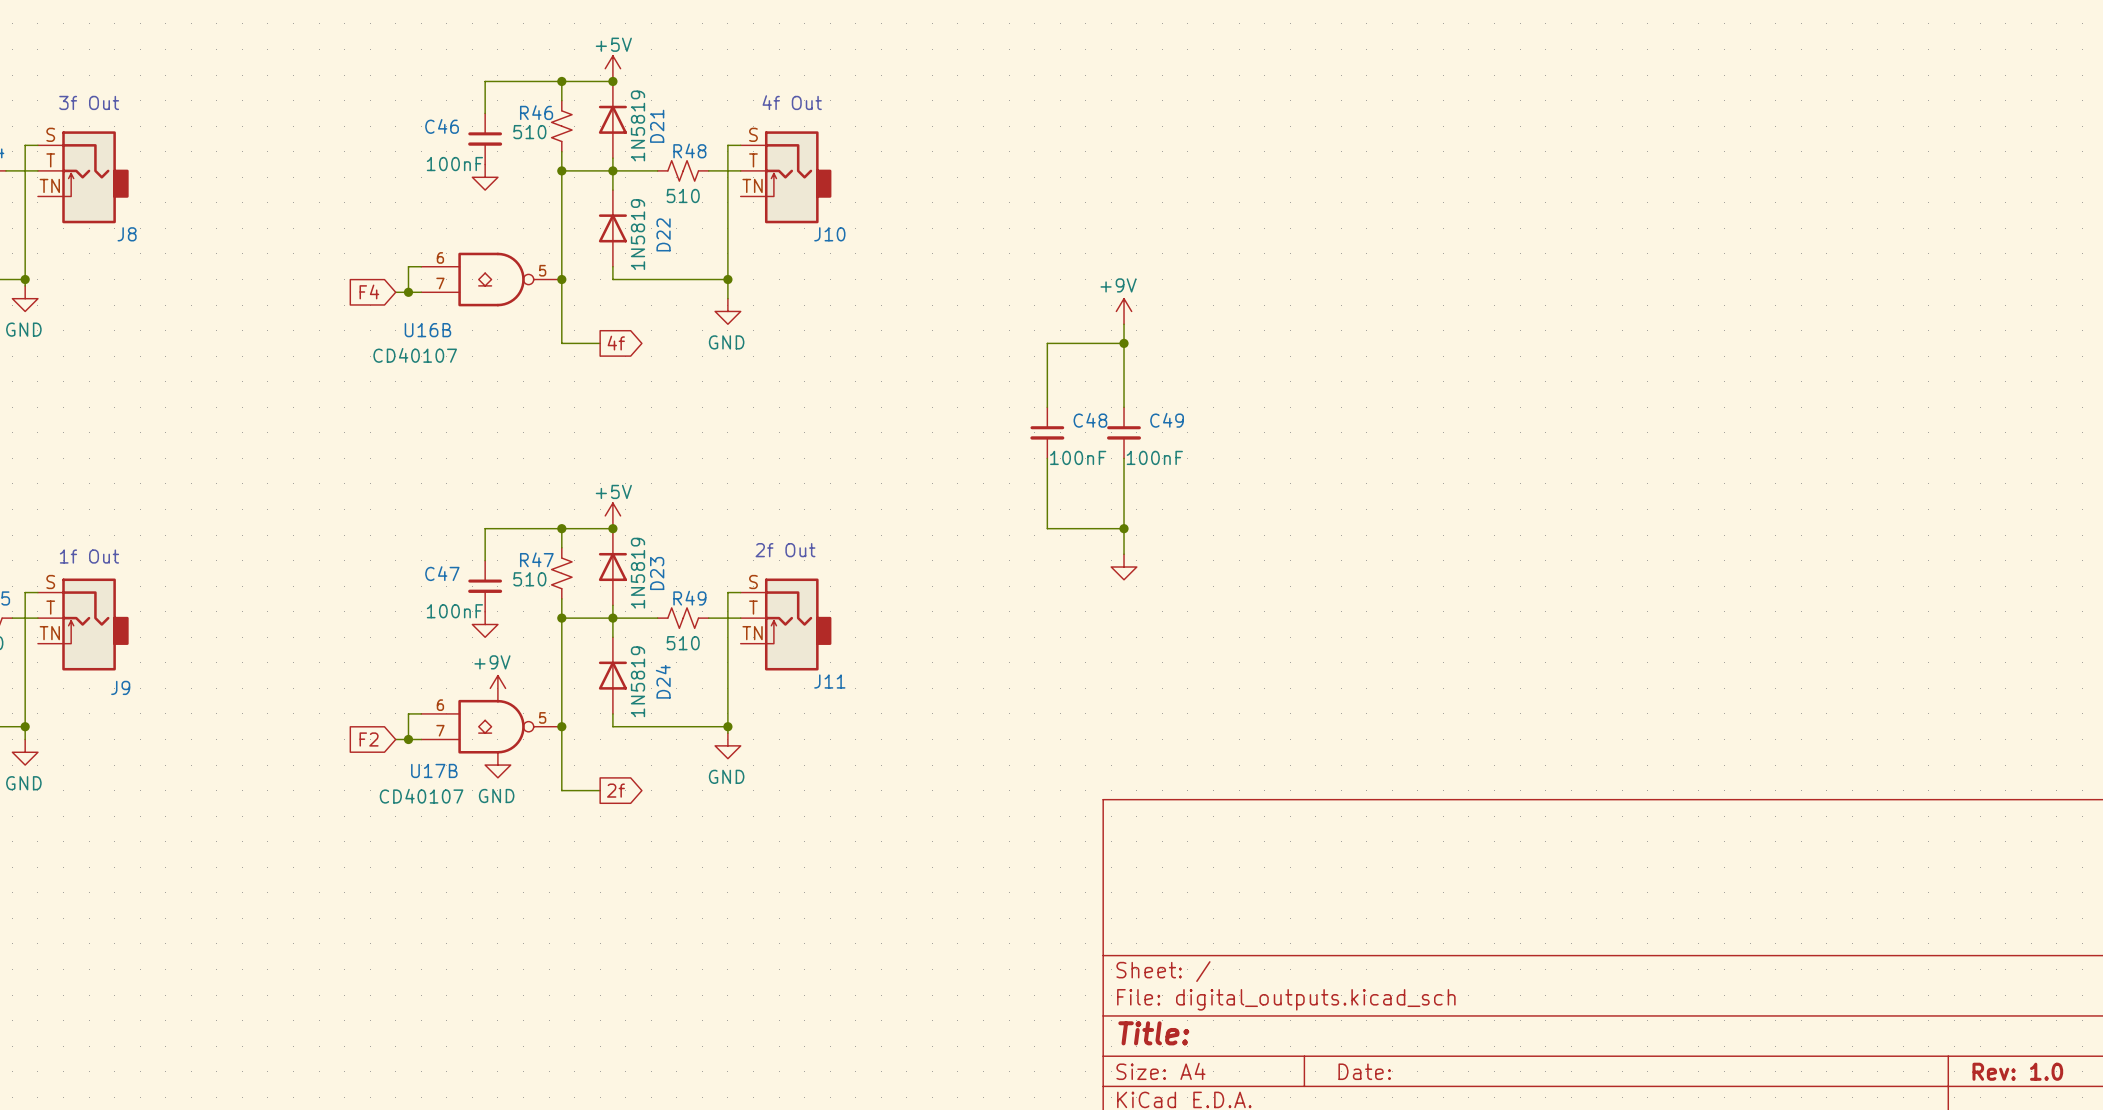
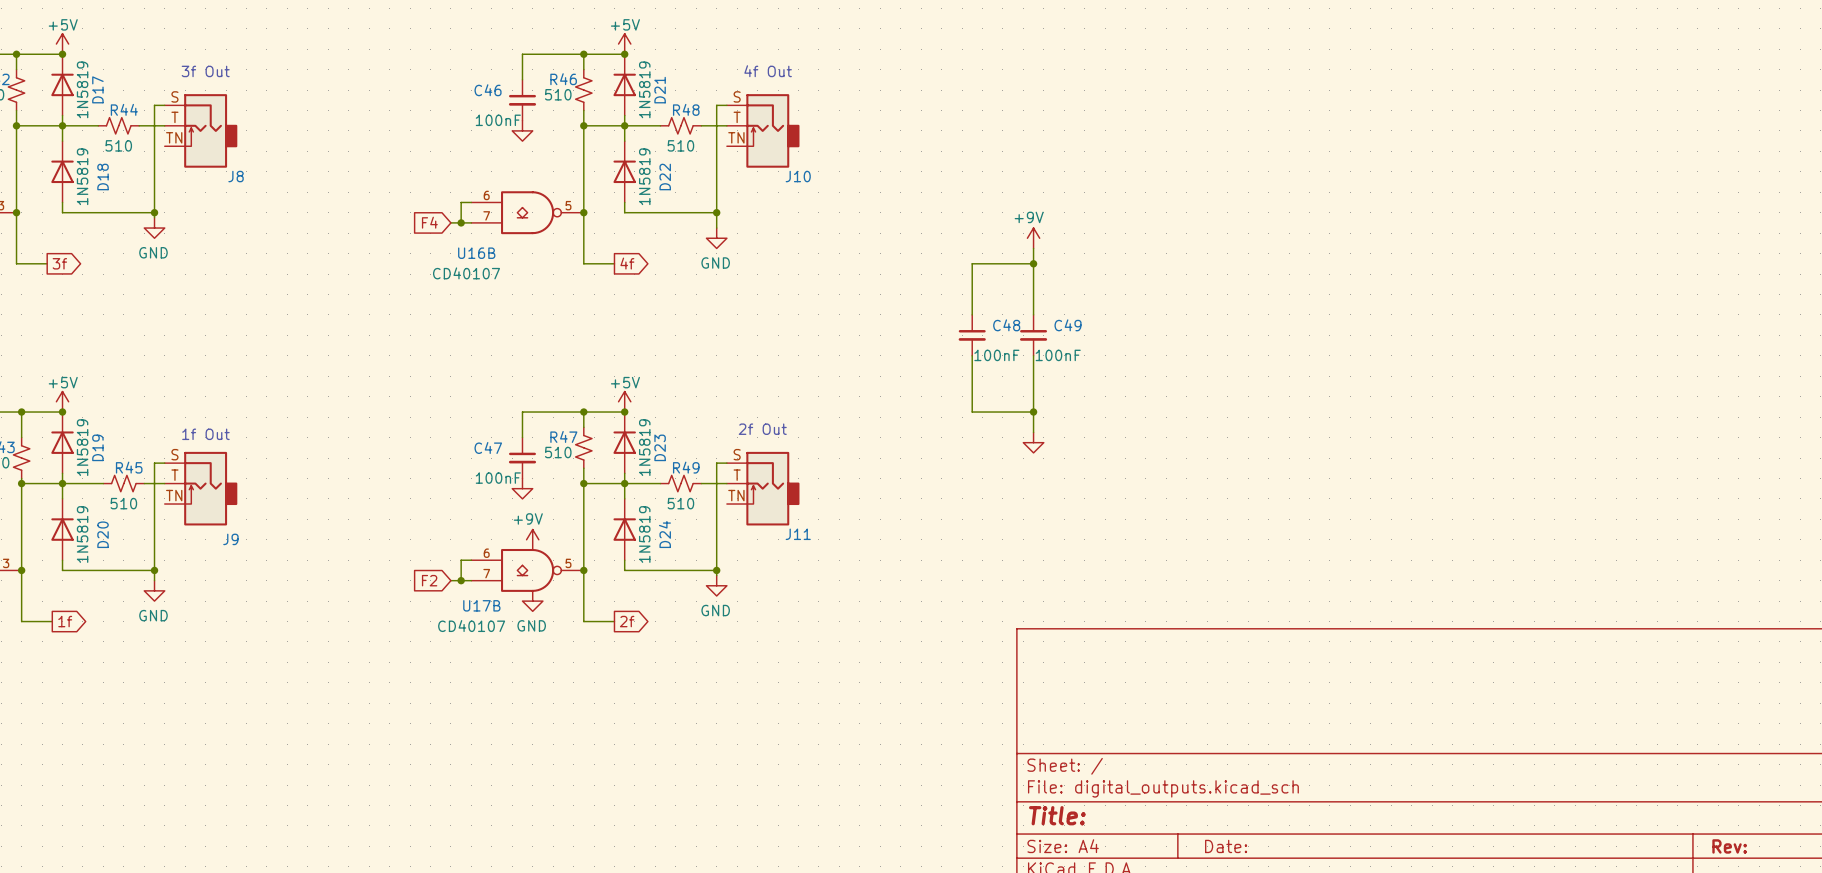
title block: Rev: 1.0 (2017, 1071) -> Rev: (1729, 846)

